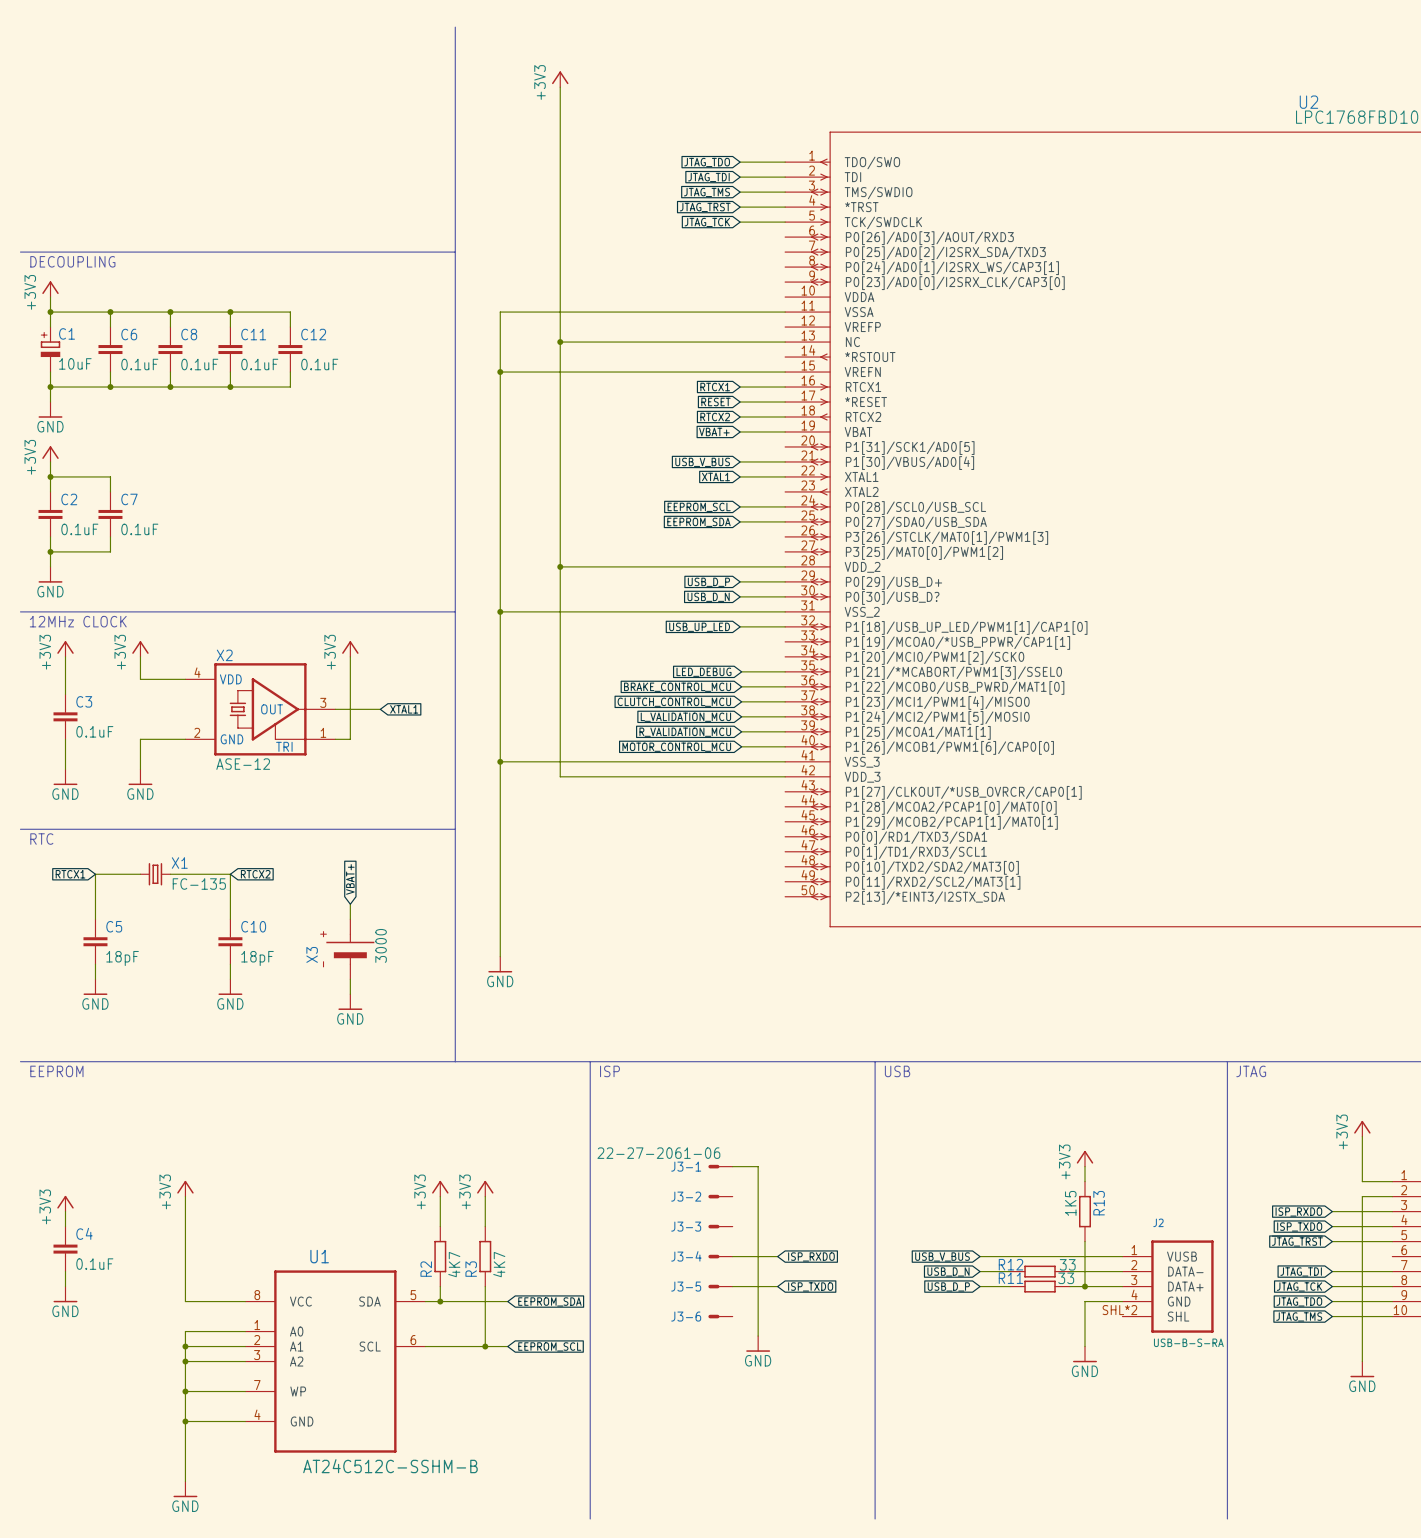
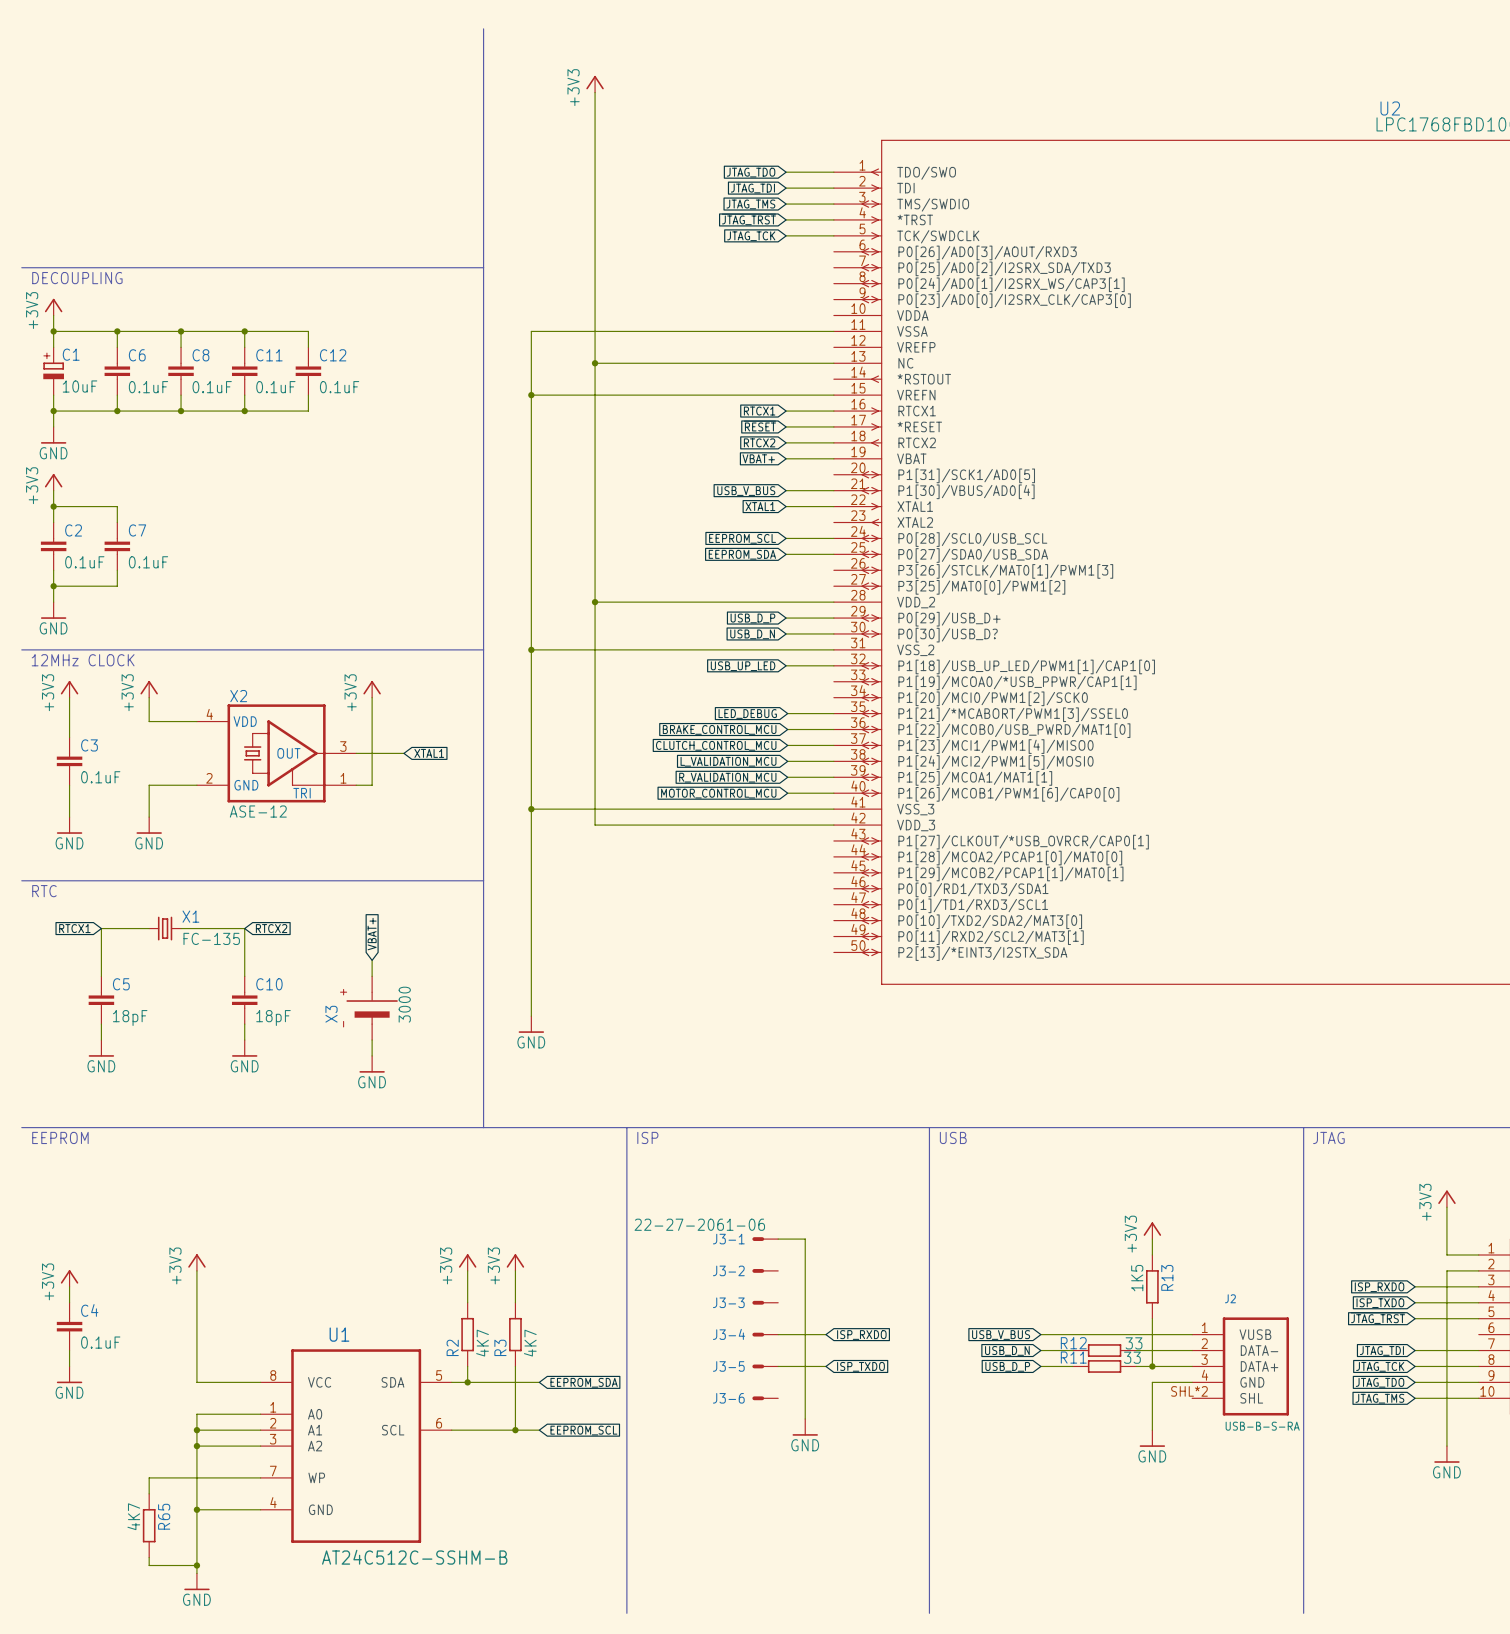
wire: none -> (196, 1477) (149, 1477) (149, 1493)
junction: (185, 1391) -> none
R65: none -> 4K7 (149, 1525)
wire: none -> (149, 1557) (149, 1565) (196, 1565)
junction: none -> (196, 1565)

